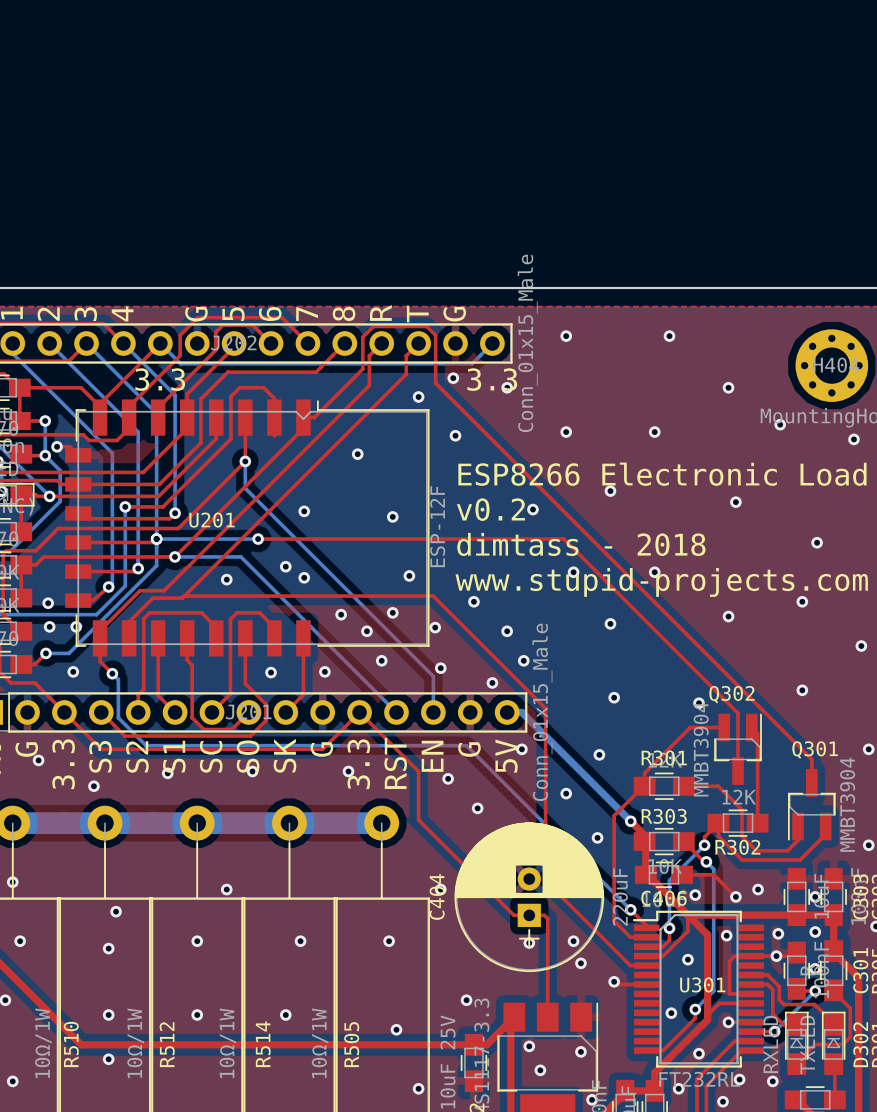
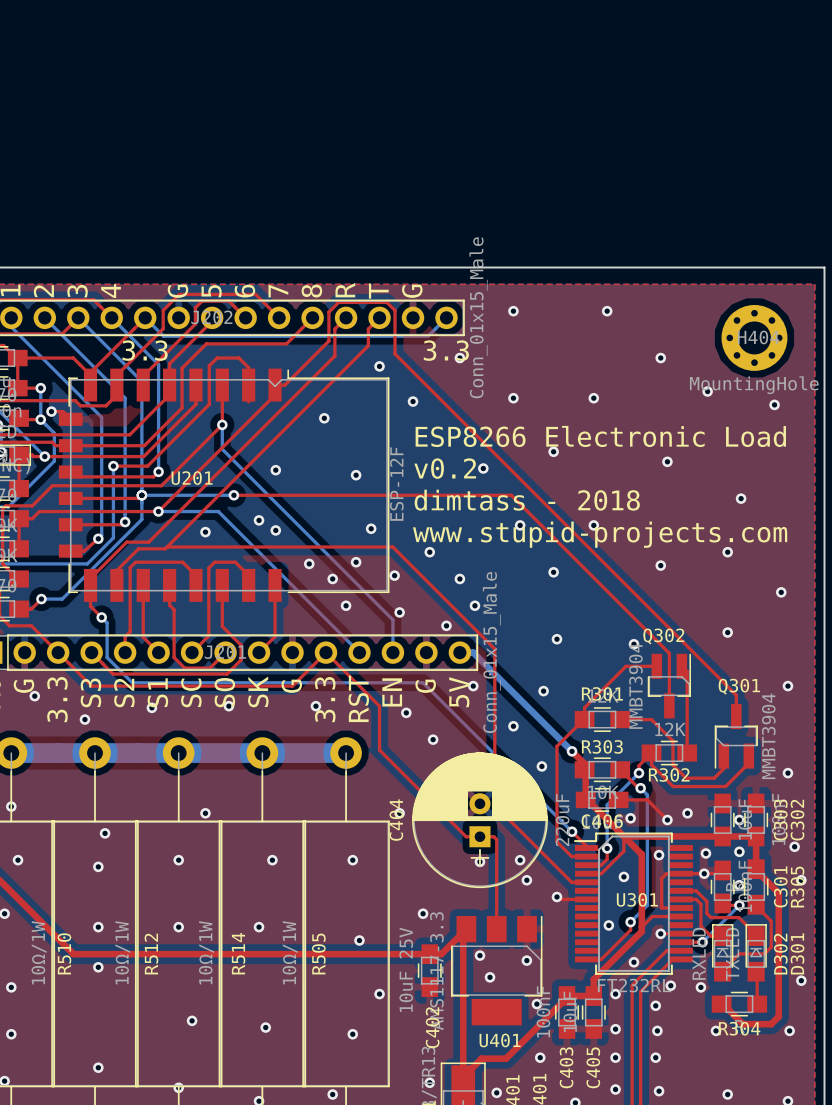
via: (453, 378) -> none
via: (48, 603) -> none
via: (49, 626) -> none
via: (76, 626) -> none
via: (73, 671) -> none
via: (324, 671) -> none
via: (271, 672) -> none

